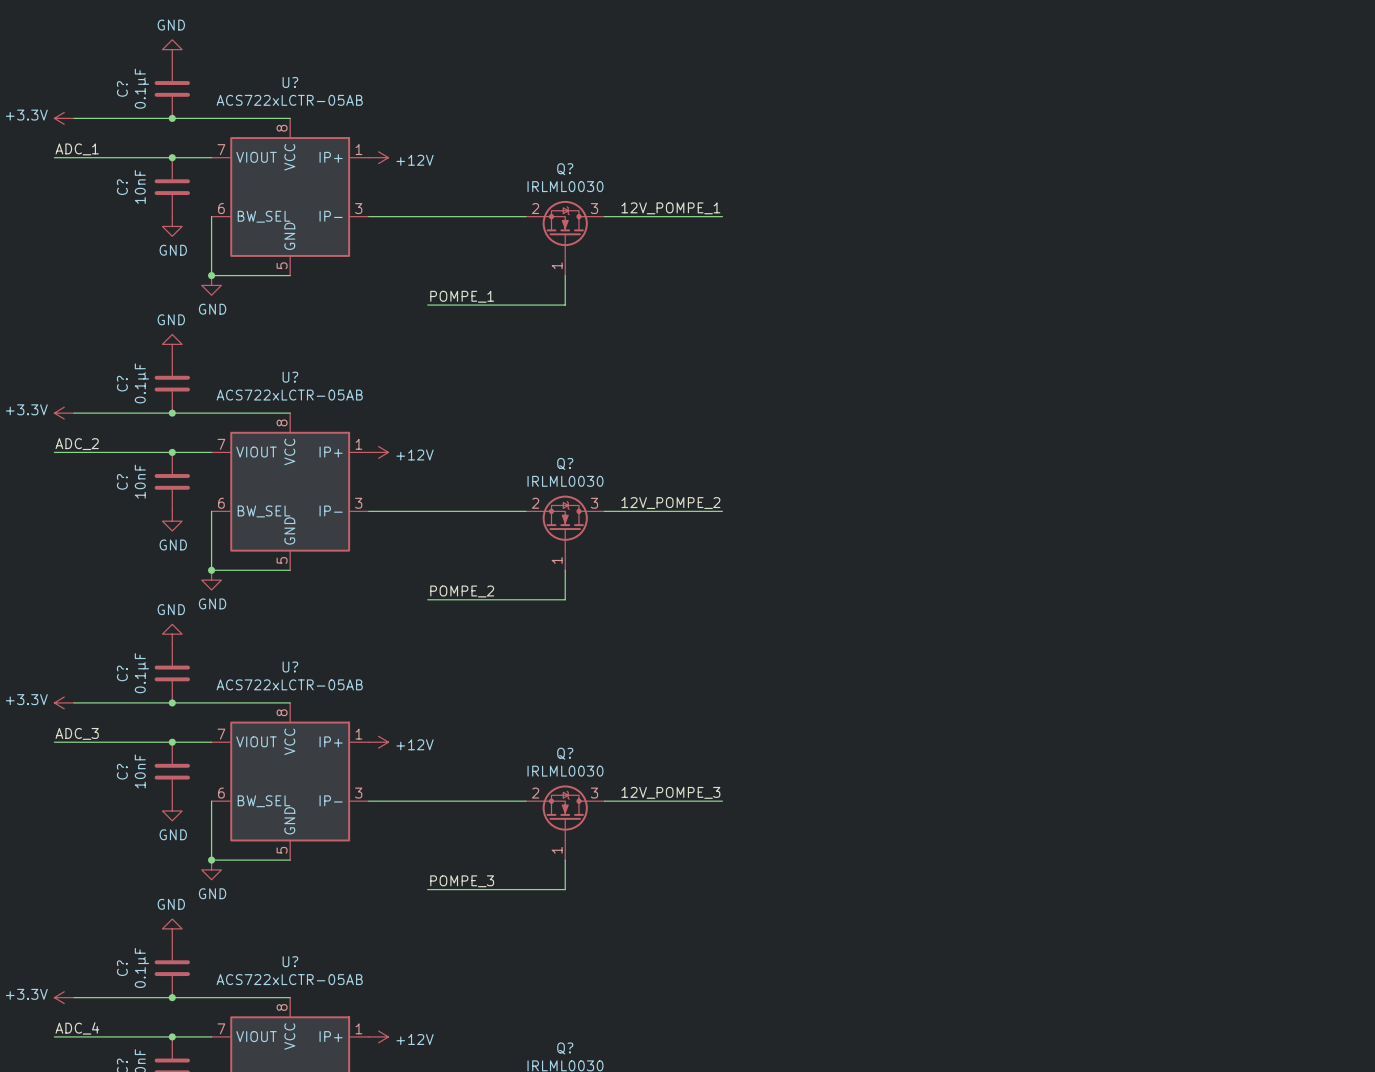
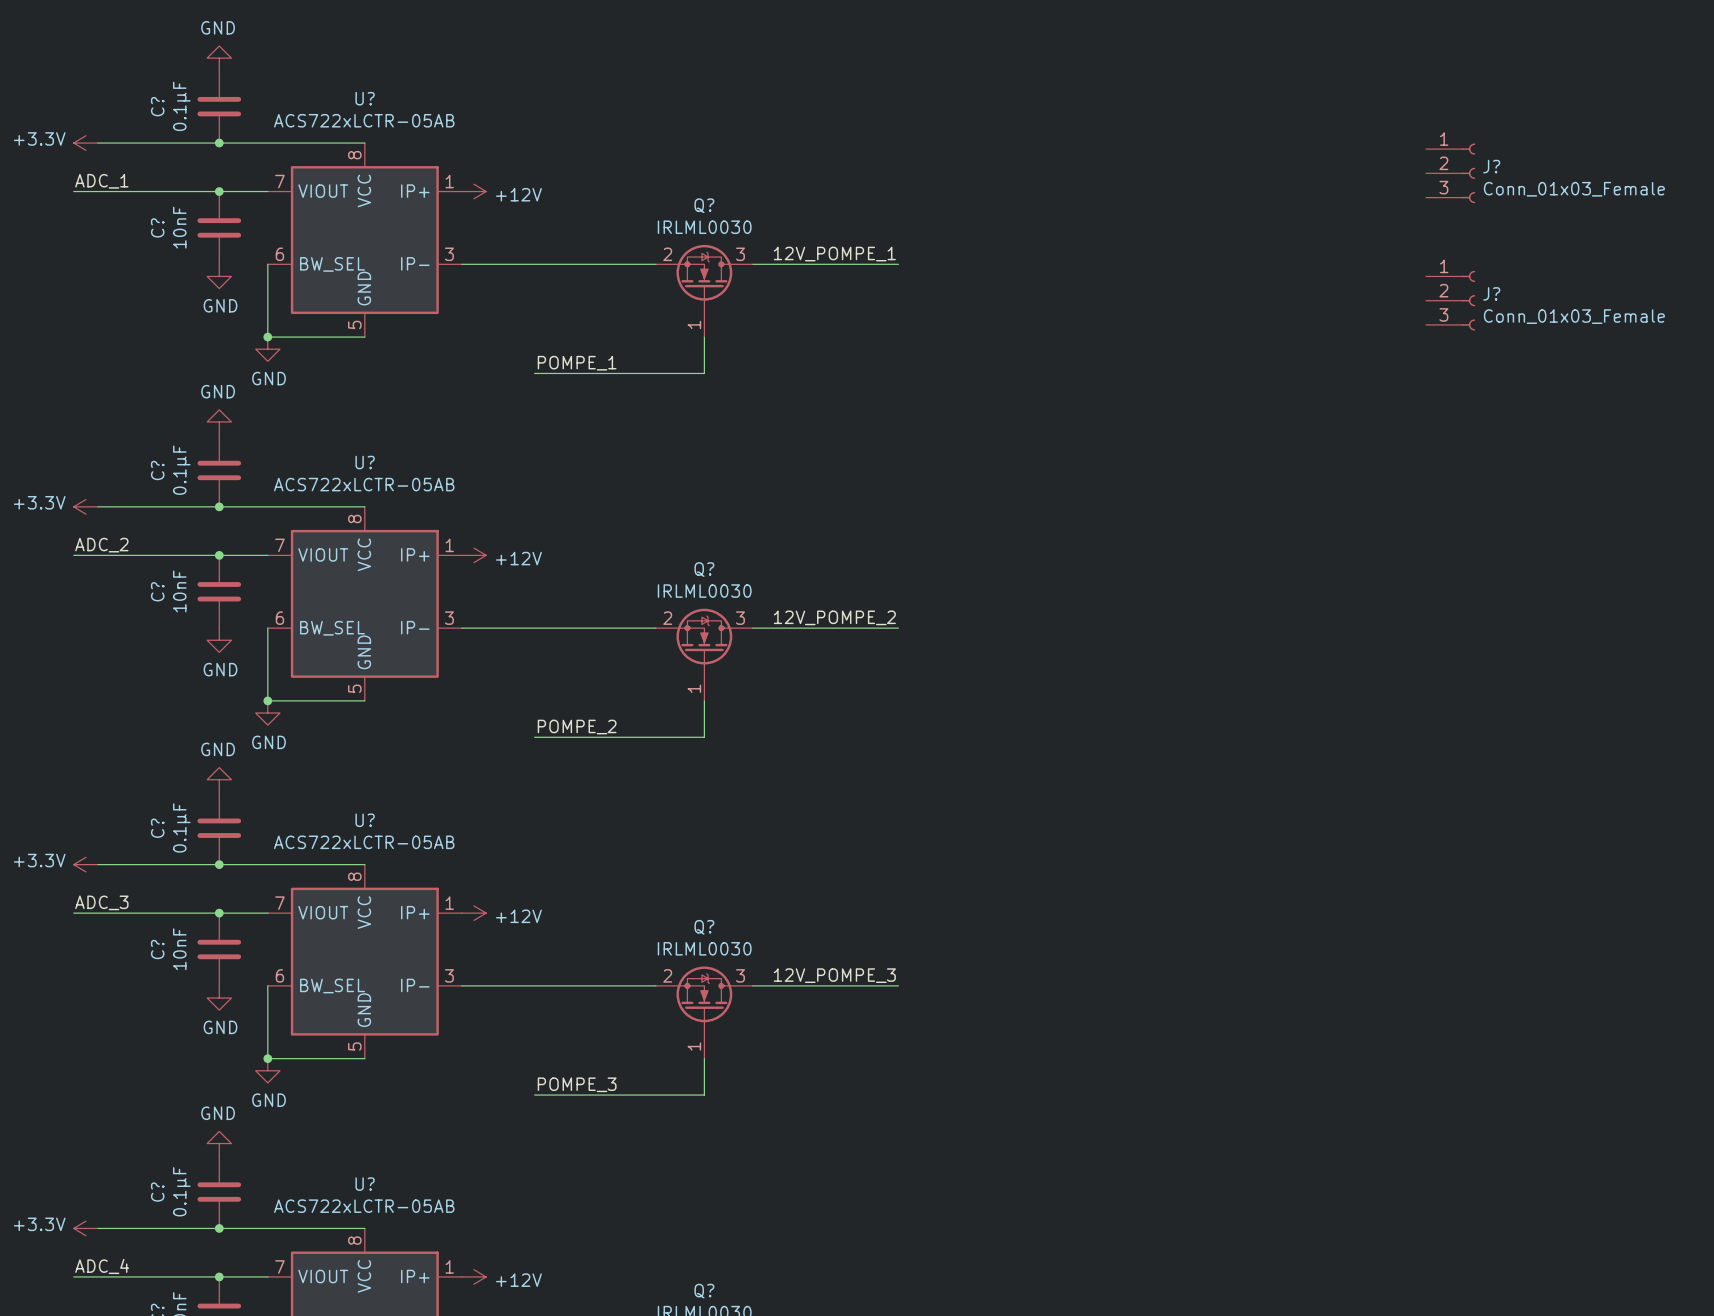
J?: none -> Conn_01x03_Female (1450, 173)
J?: none -> Conn_01x03_Female (1450, 300)

